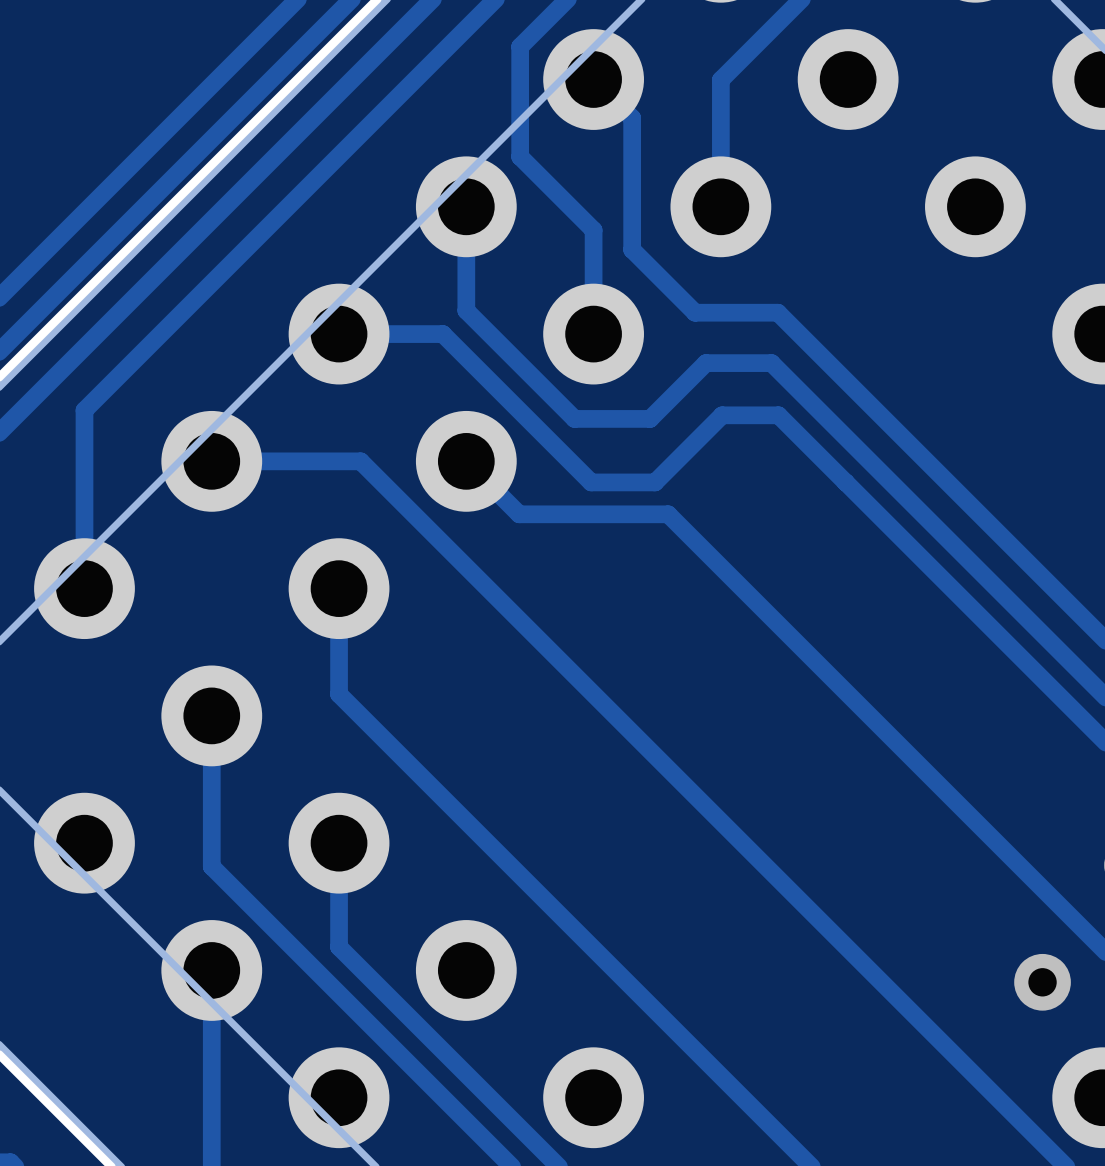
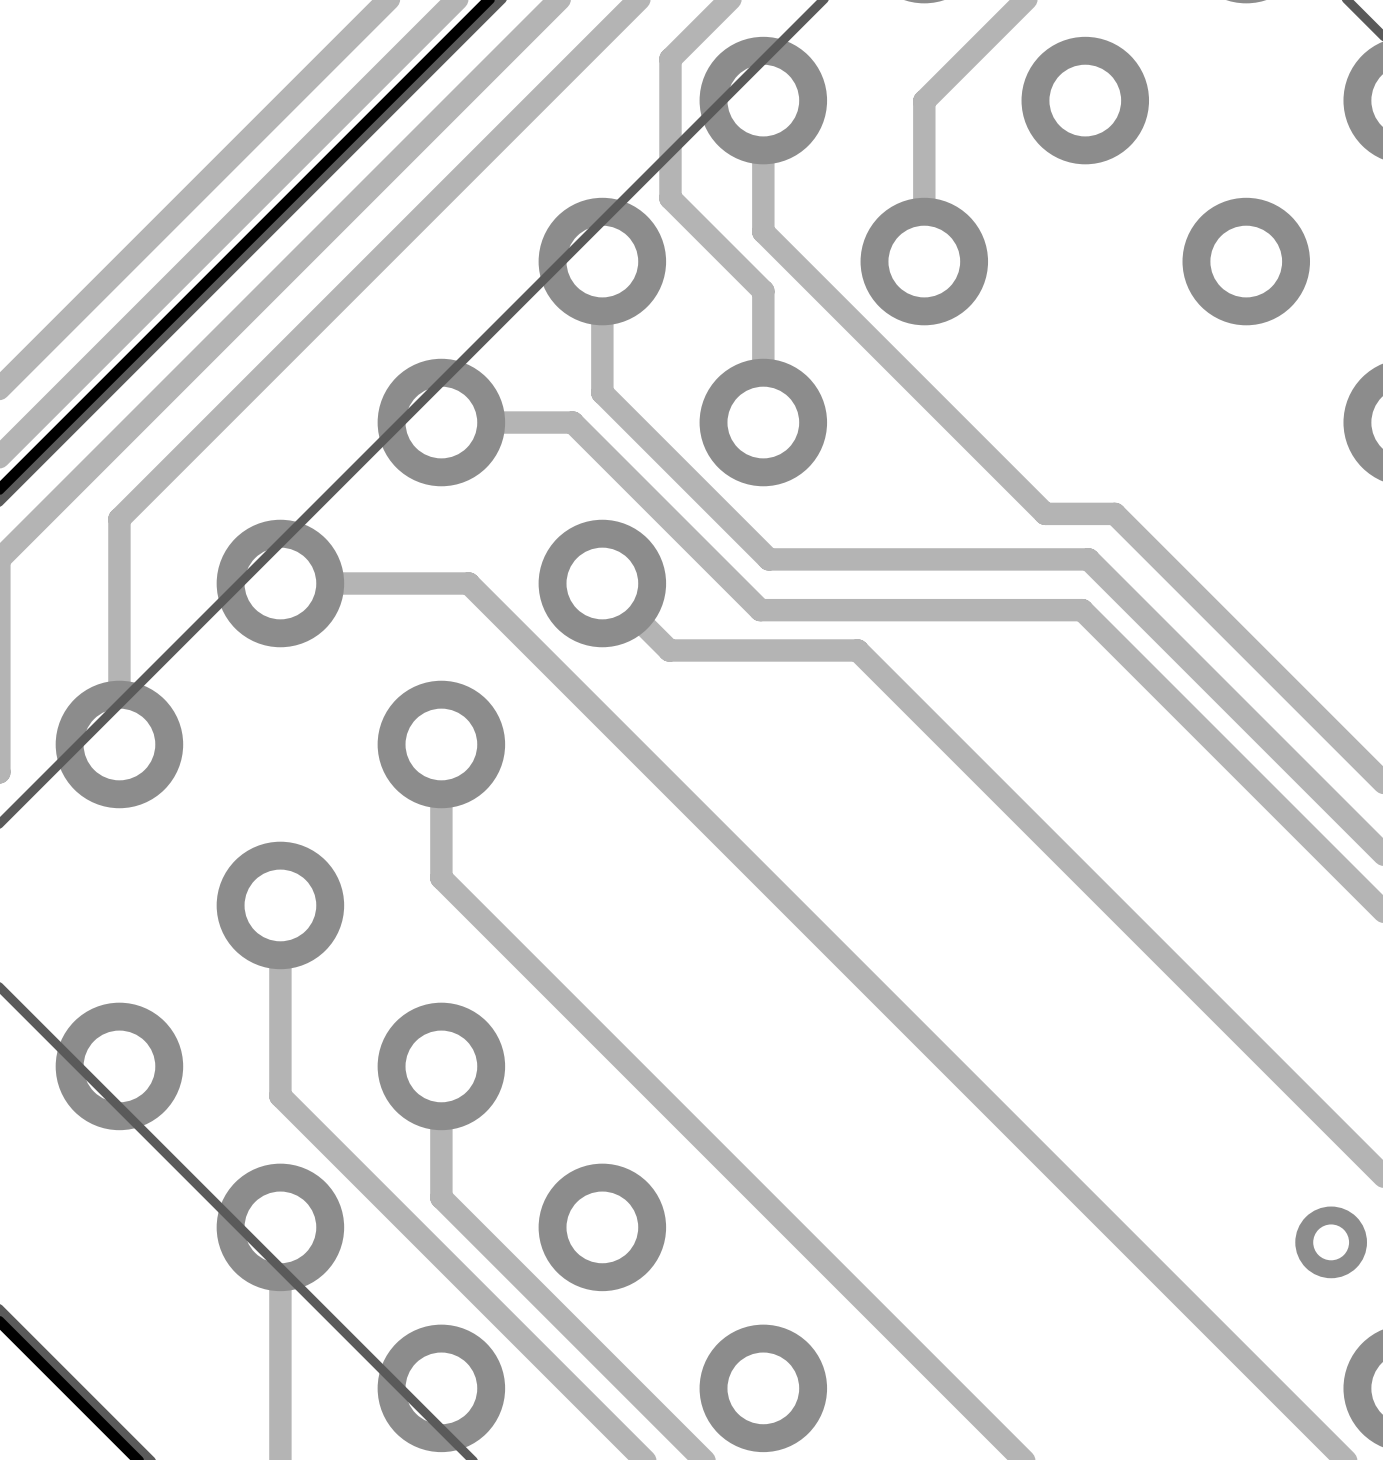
track: (593, 79) (632, 118) (632, 249) (695, 312) (777, 312) (871, 406) -> (763, 100) (763, 231) (1045, 513) (1114, 513)
track: (574, 418) (650, 418) (705, 363) (771, 363) (850, 442) -> (739, 529) (768, 559) (1088, 559)
track: (655, 482) (722, 415) (778, 415) (845, 482) -> (841, 610) (1082, 610)

